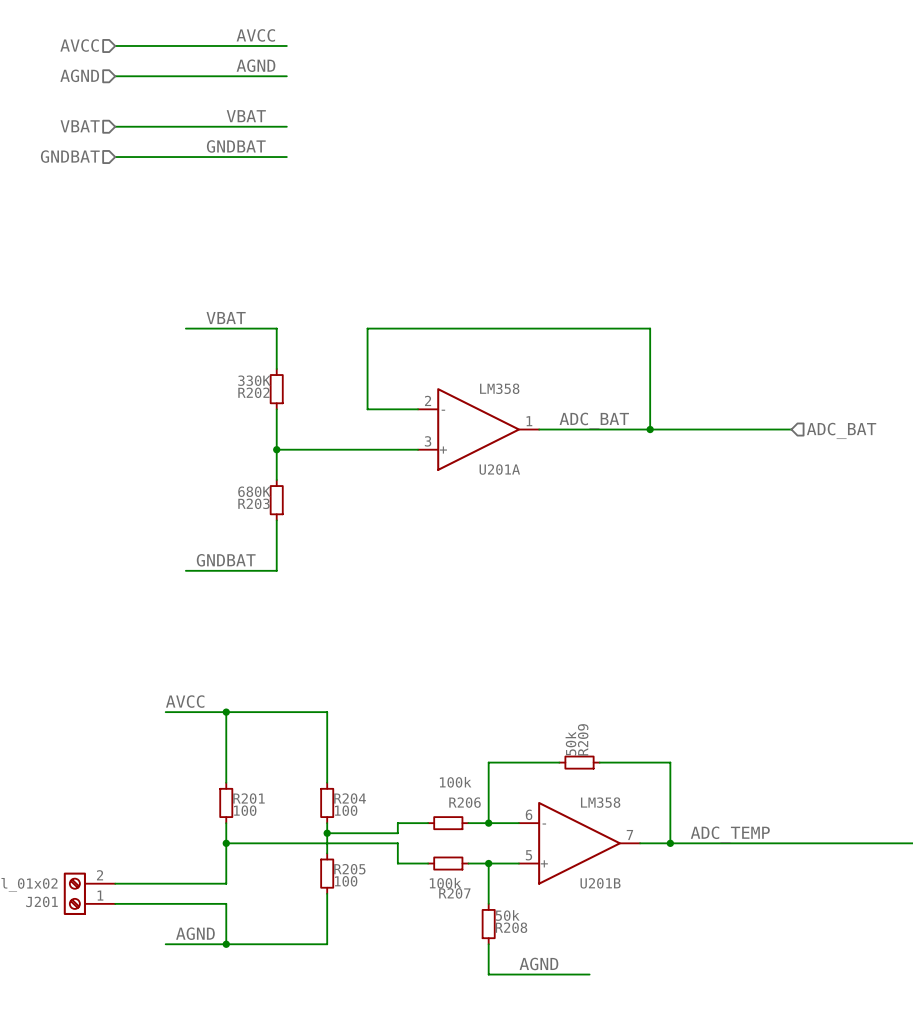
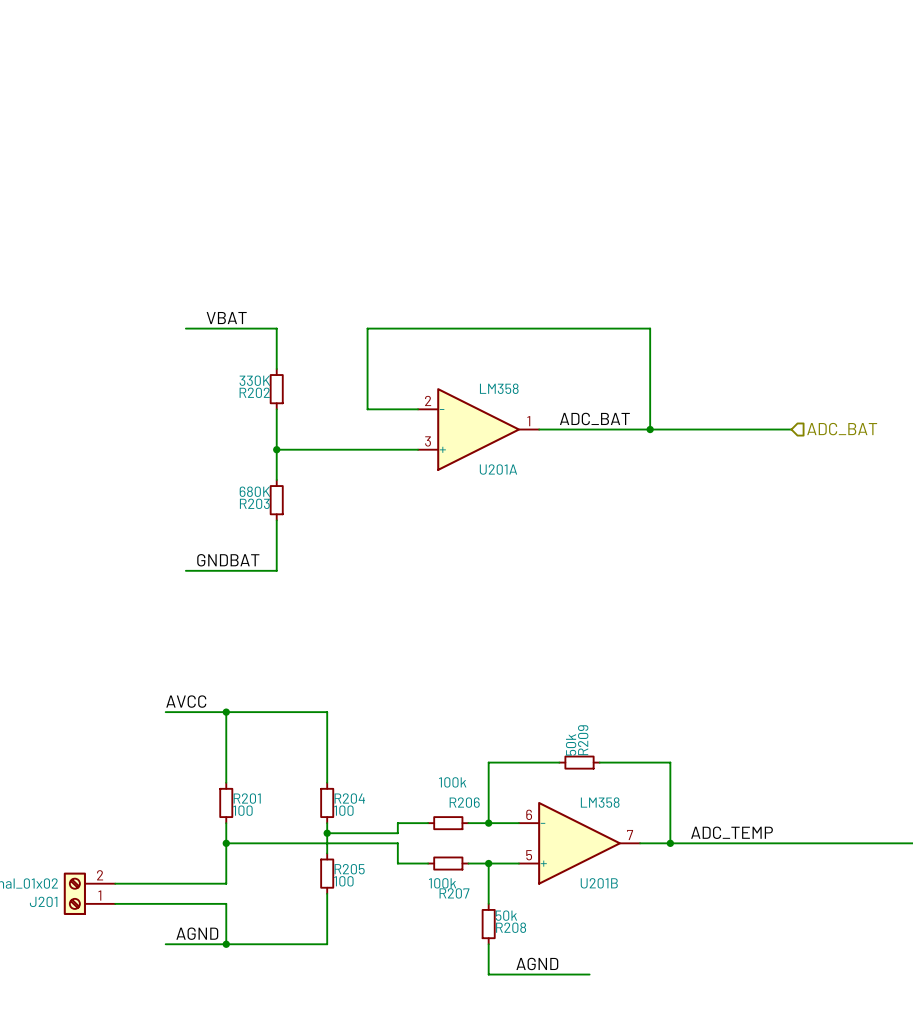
label: AVCC (255, 35) -> none
hierarchical label: AVCC (79, 45) -> none
wire: (115, 45) (286, 45) -> none
label: AGND (255, 65) -> none
hierarchical label: AGND (79, 75) -> none
wire: (115, 76) (286, 76) -> none
label: VBAT (246, 116) -> none
hierarchical label: VBAT (80, 126) -> none
wire: (115, 126) (286, 126) -> none
label: GNDBAT (236, 146) -> none
hierarchical label: GNDBAT (70, 156) -> none
wire: (115, 157) (286, 157) -> none

